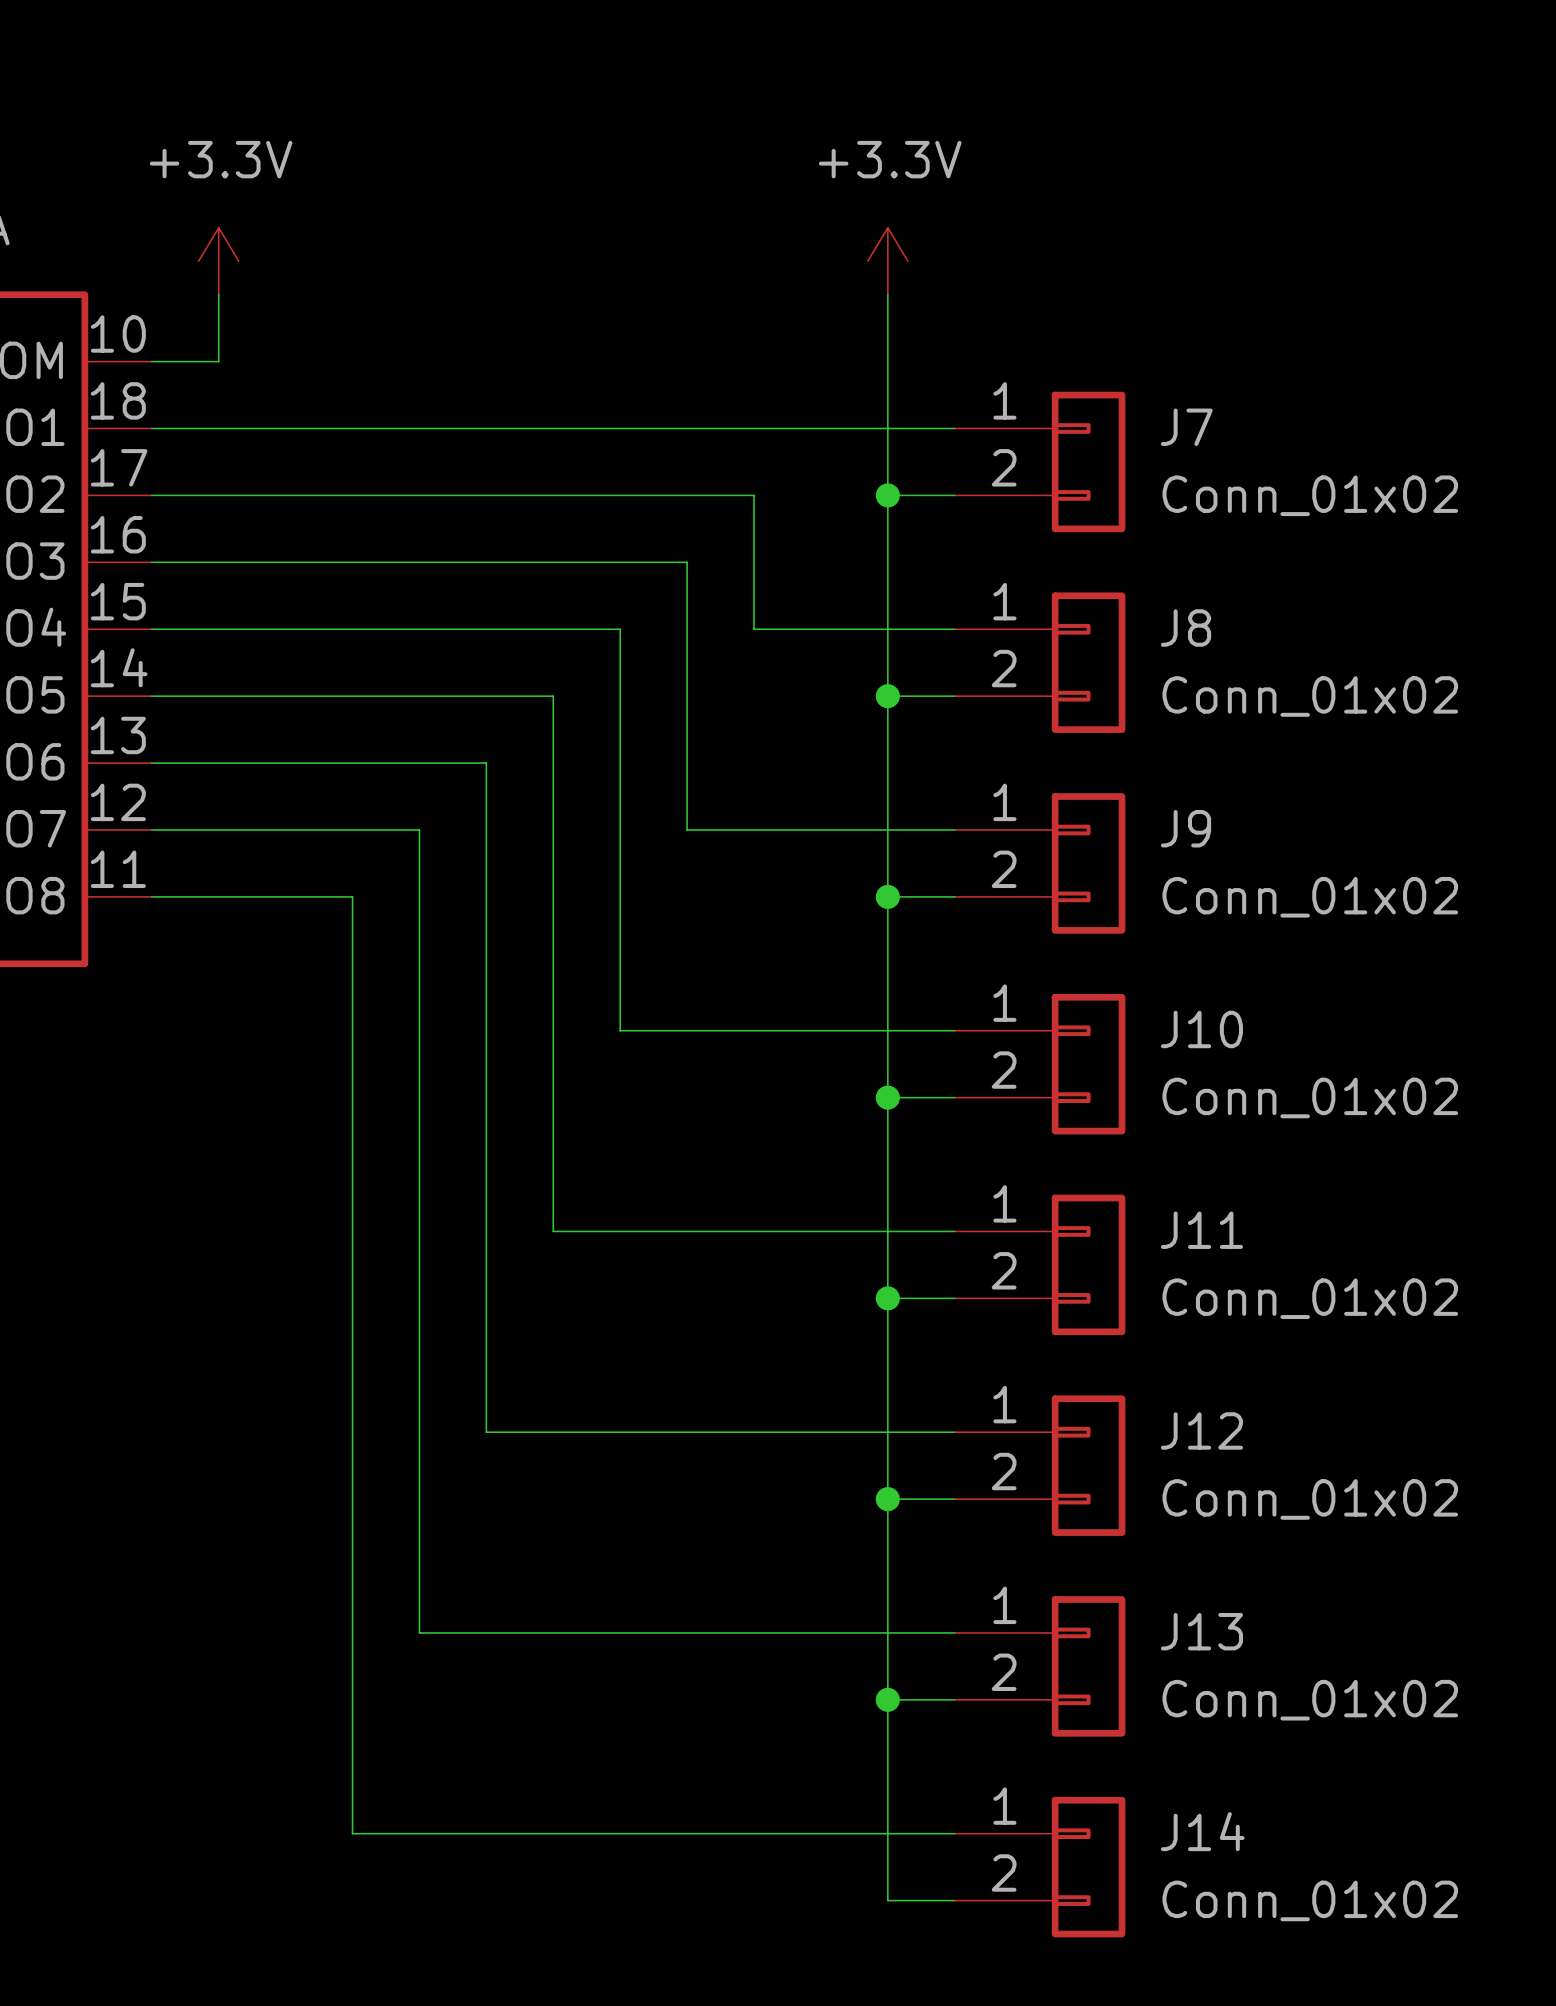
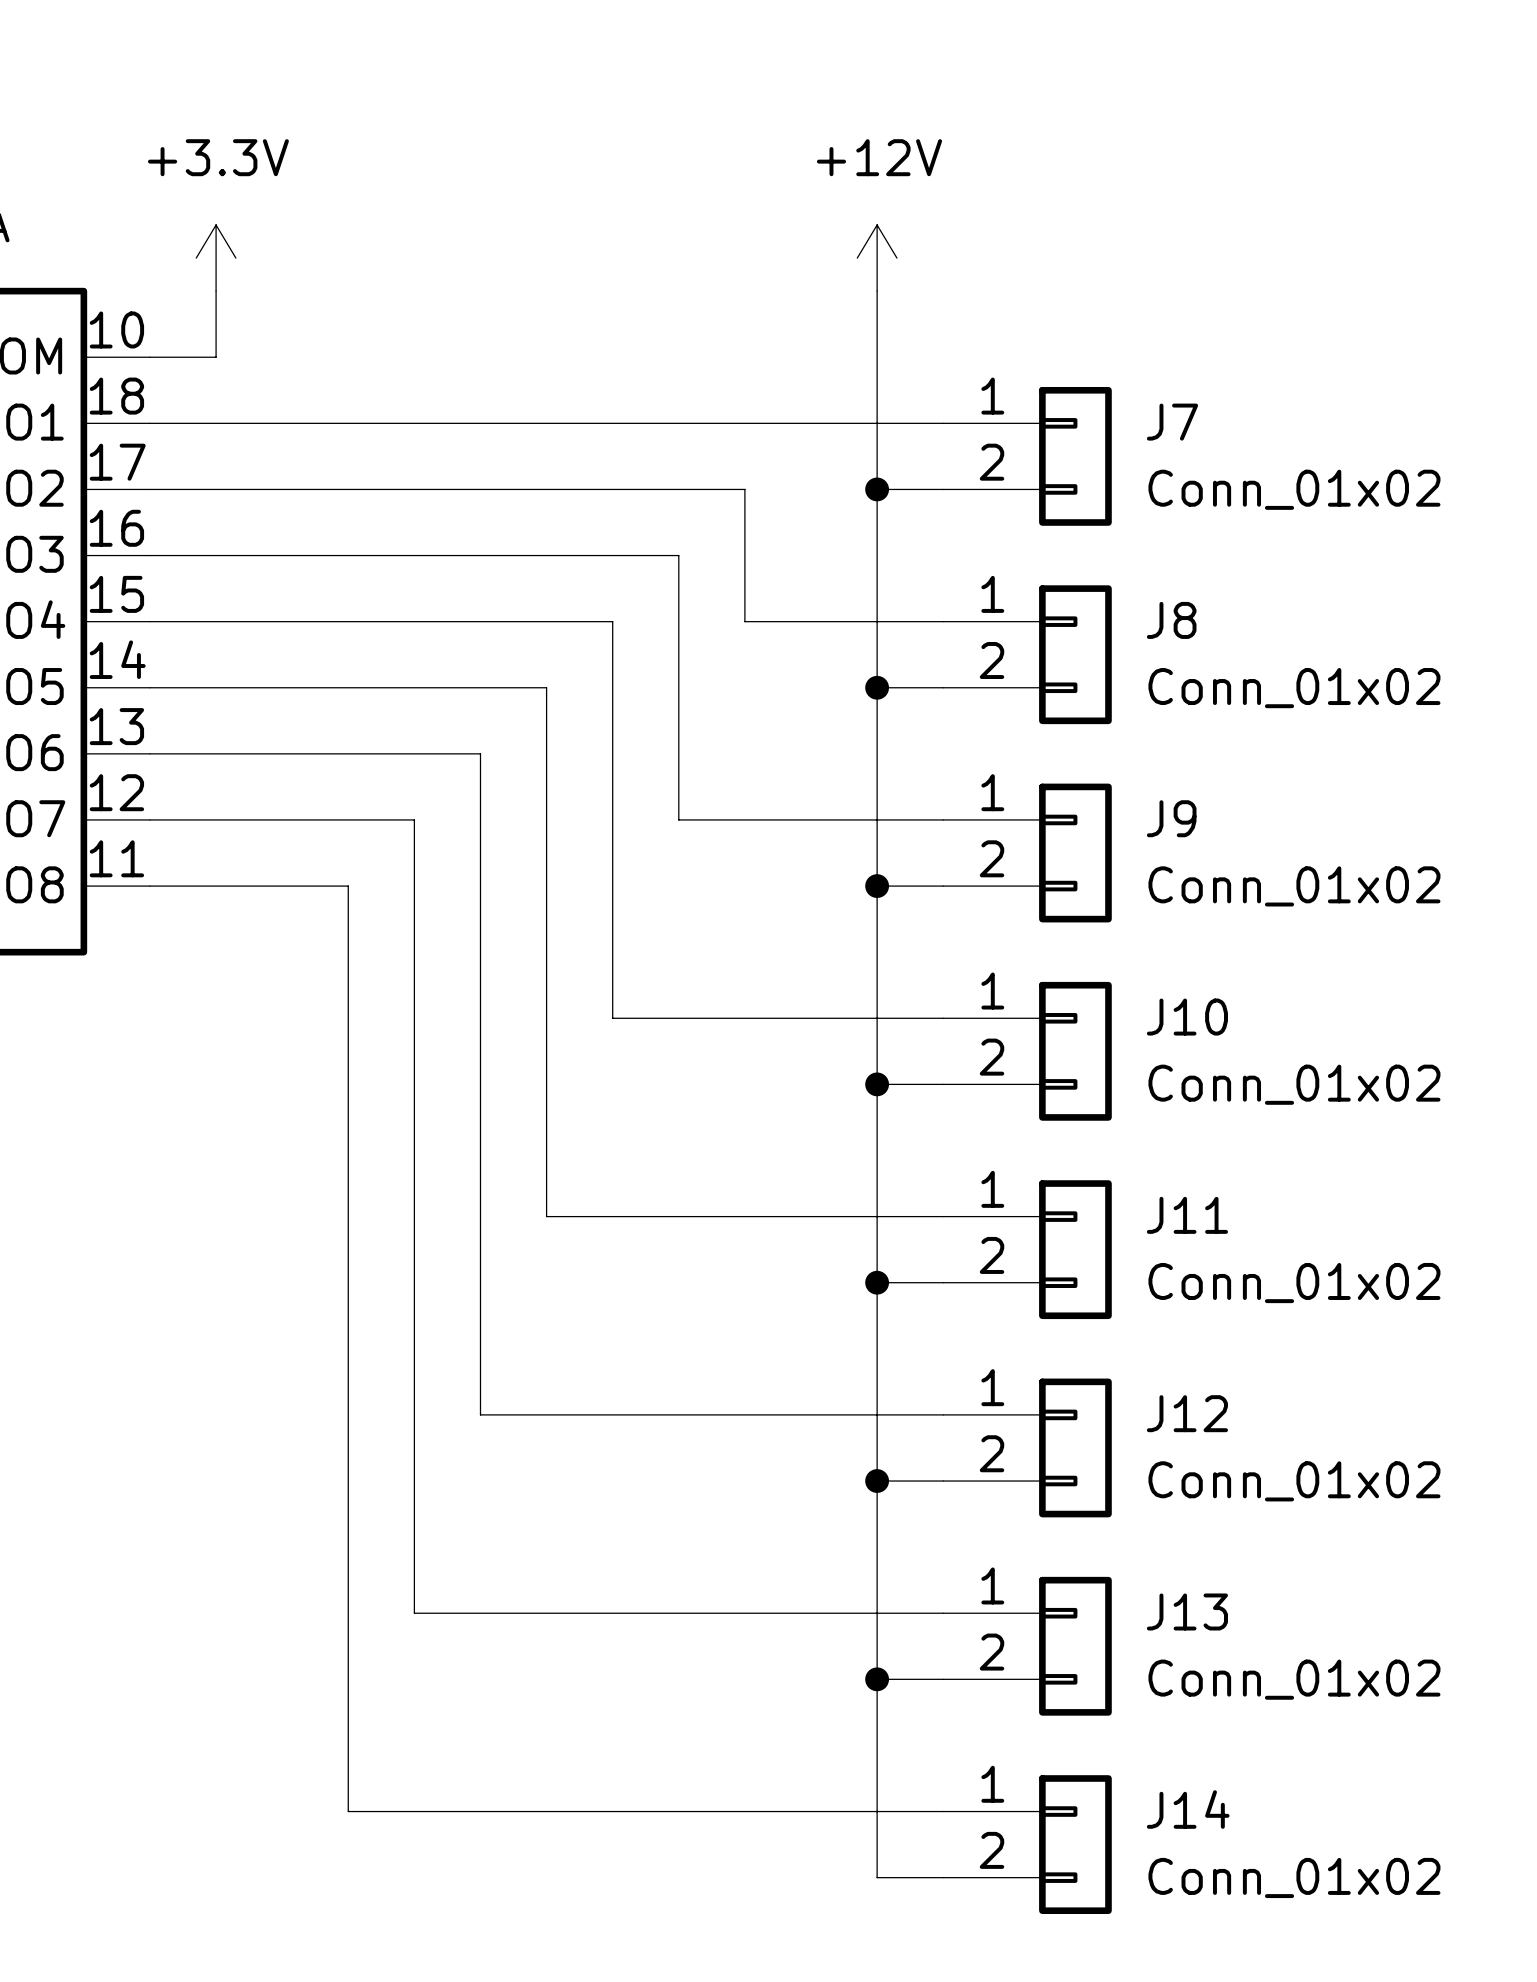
power symbol: +3.3V (887, 261) -> +12V (877, 258)

